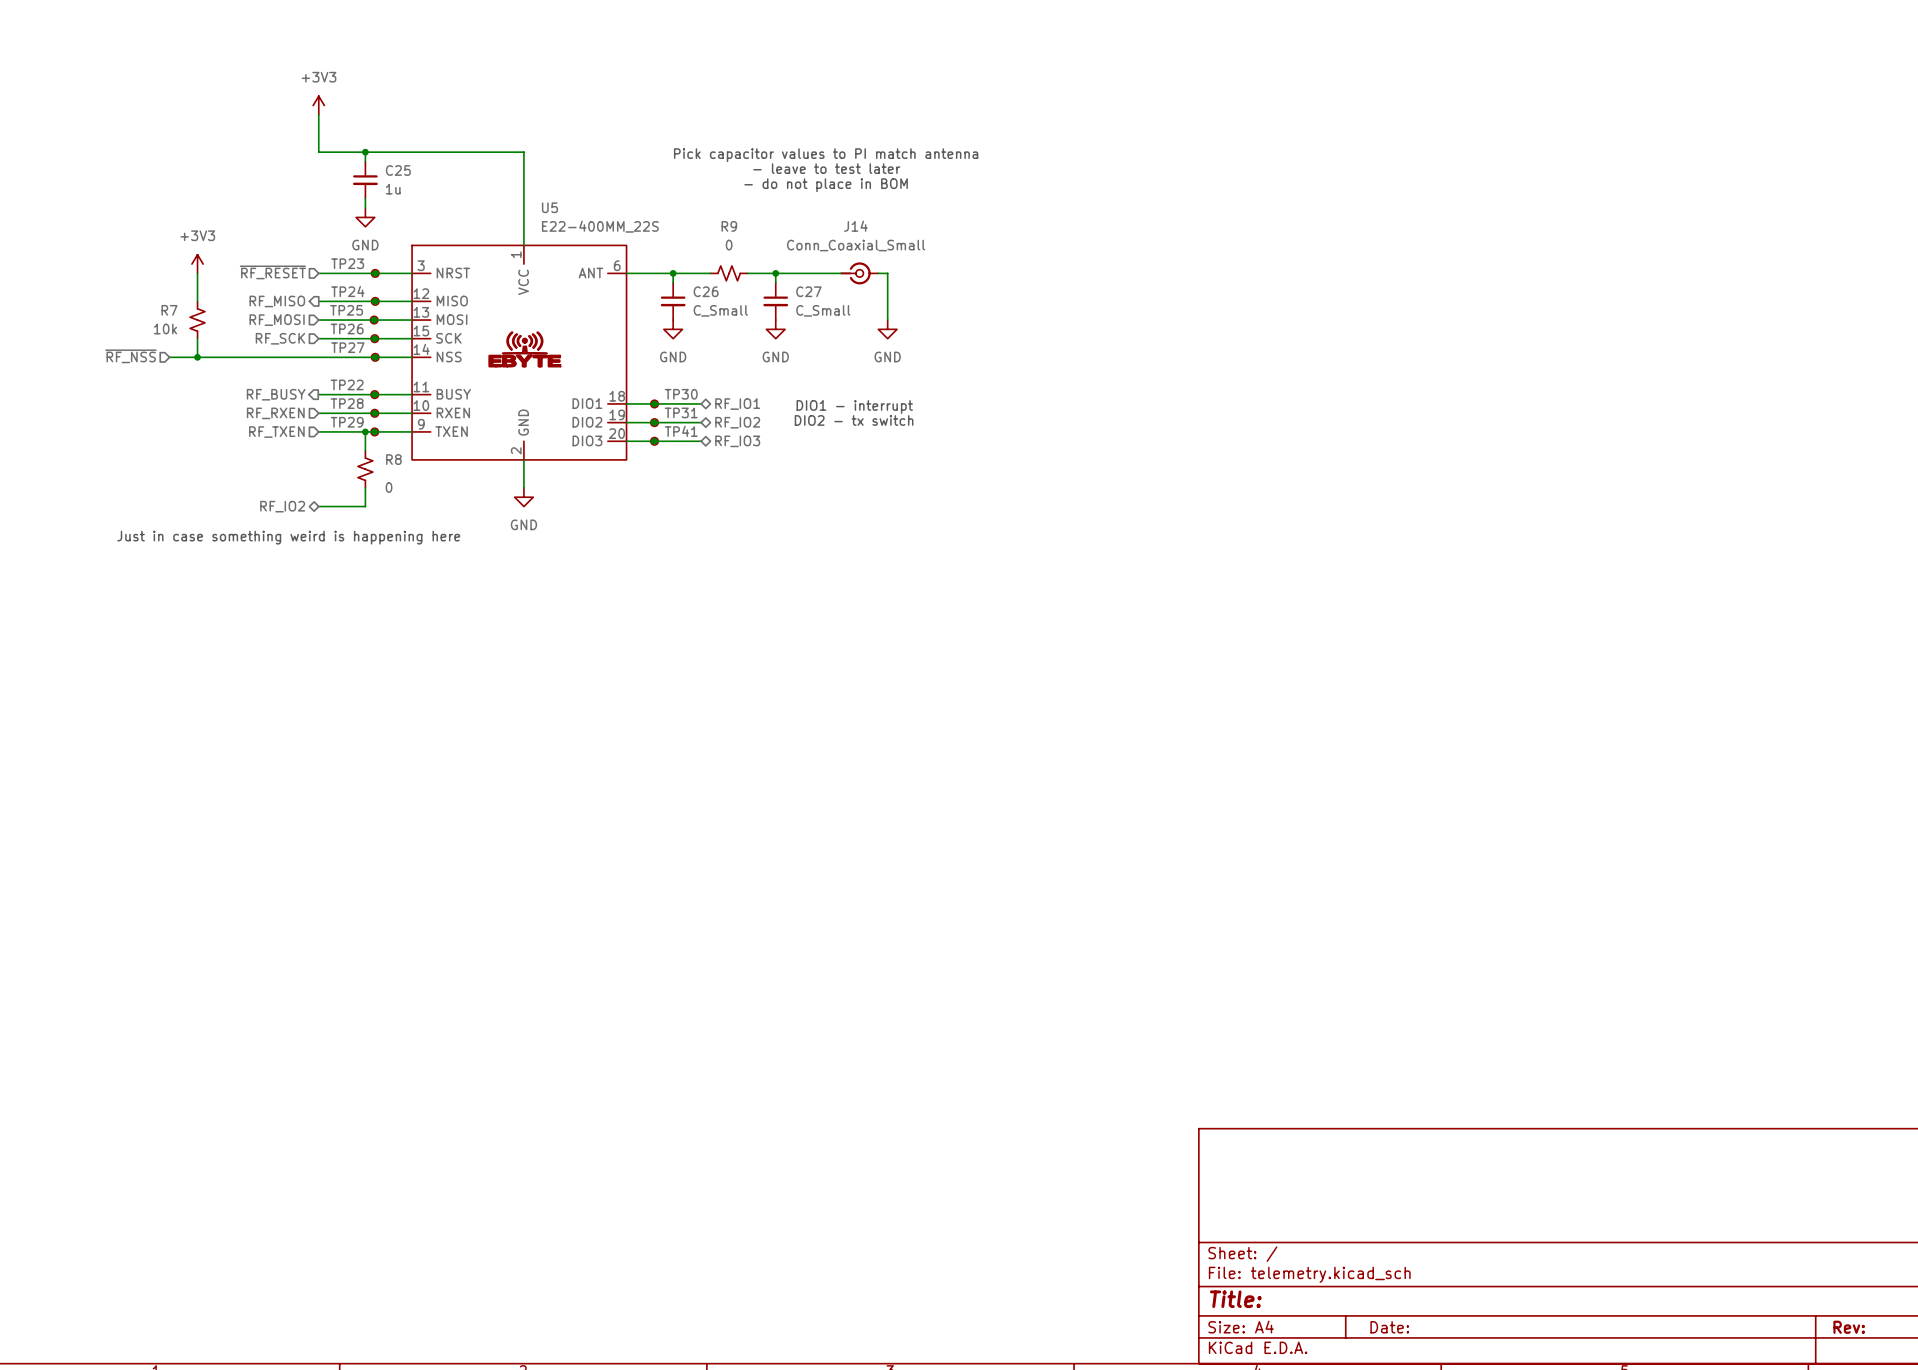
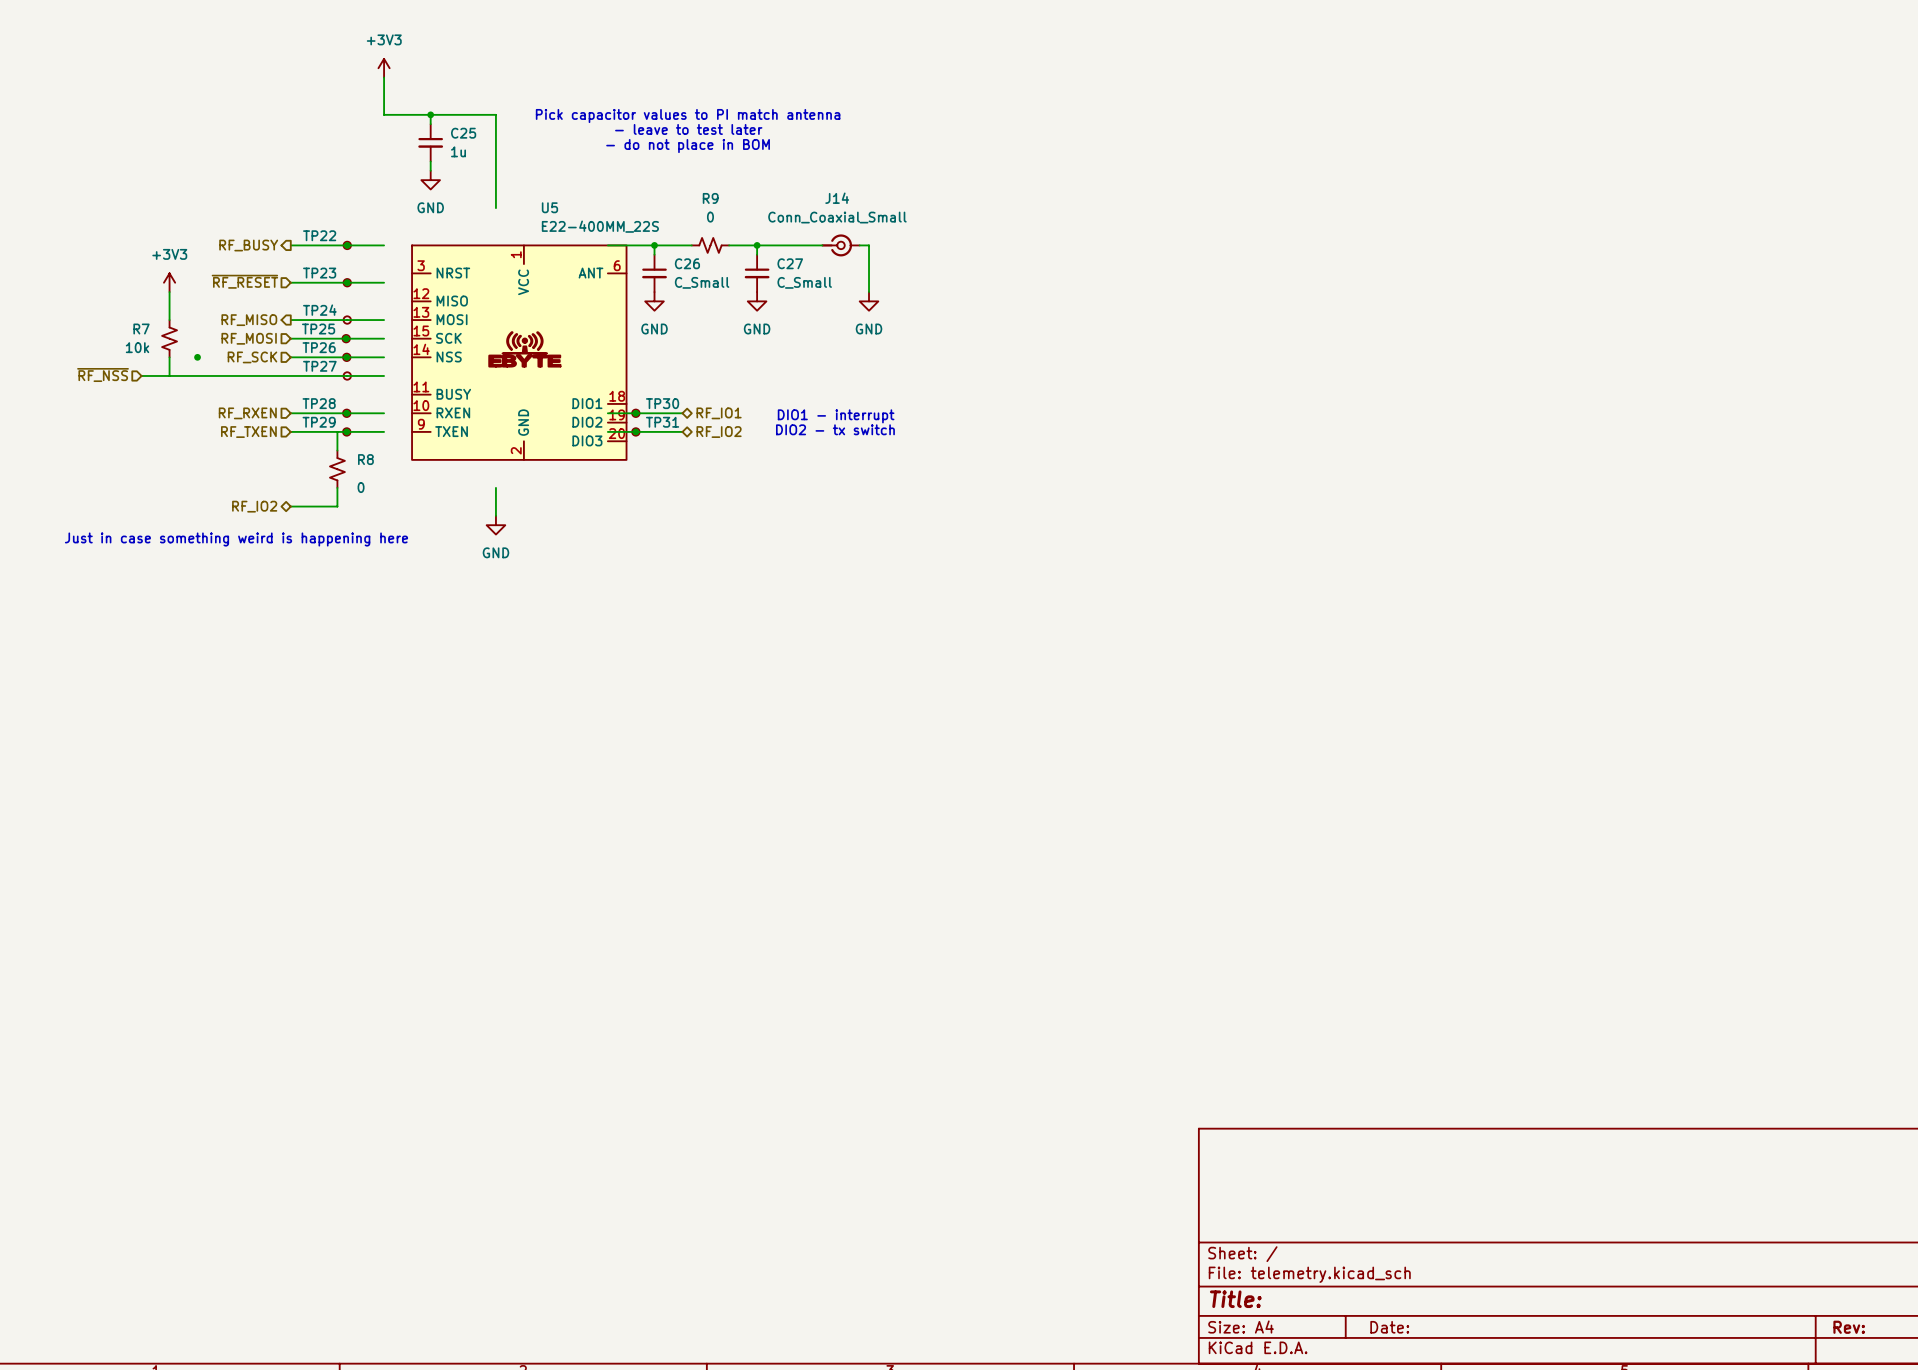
wire: none -> (384, 77) (384, 114) (495, 114) (495, 208)
power symbol position: +3V3 (318, 105) -> +3V3 (384, 68)
wire: (318, 114) (318, 152) (523, 152) (523, 245) -> none
junction: none -> (430, 114)
wire: (365, 152) (365, 161) -> (430, 114) (430, 124)
junction: (365, 152) -> none
text position: Pick capacitor values to PI match antenna (826, 155) -> Pick capacitor values to PI match antenna (688, 116)
text position: - leave to test later (826, 168) -> - leave to test later (688, 129)
C25 position: (365, 180) -> (430, 142)
text position: - do not place in BOM (826, 185) -> - do not place in BOM (688, 146)
wire: (365, 198) (365, 208) -> (430, 161) (430, 170)
power symbol position: GND (365, 217) -> GND (430, 180)
junction: none -> (347, 245)
power symbol position: +3V3 (197, 264) -> +3V3 (169, 282)
hierarchical label position: ~{RF_RESET} (272, 272) -> ~{RF_RESET} (244, 281)
wire: (197, 273) (197, 301) -> (169, 292) (169, 320)
wire: (318, 273) (412, 273) -> (290, 282) (384, 282)
junction: (375, 273) -> none
TP23 position: (375, 273) -> (347, 282)
wire: (626, 273) (710, 273) -> (607, 245) (691, 245)
wire: (673, 273) (673, 282) -> (654, 245) (654, 254)
junction position: (673, 273) -> (654, 245)
R9 position: (729, 273) -> (710, 245)
wire: (747, 273) (841, 273) -> (729, 245) (822, 245)
wire: (775, 273) (775, 282) -> (757, 245) (757, 254)
junction position: (775, 273) -> (757, 245)
J14 position: (859, 273) -> (841, 245)
wire: (878, 273) (887, 273) (887, 320) -> (859, 245) (869, 245) (869, 292)
junction: none -> (347, 282)
hierarchical label position: RF_MISO (277, 301) -> RF_MISO (249, 320)
wire: (318, 301) (412, 301) -> (290, 245) (384, 245)
junction: (375, 301) -> none
TP24 position: (375, 301) -> (347, 320)
C26 position: (673, 301) -> (654, 273)
C27 position: (775, 301) -> (757, 273)
R7 position: (197, 320) -> (169, 338)
hierarchical label position: RF_MOSI (277, 320) -> RF_MOSI (249, 338)
junction: (374, 320) -> none
TP25 position: (374, 320) -> (346, 338)
wire: (384, 320) (412, 320) -> (290, 320) (318, 320)
power symbol position: GND (673, 329) -> GND (654, 301)
power symbol position: GND (775, 329) -> GND (757, 301)
power symbol position: GND (887, 329) -> GND (869, 301)
wire: (197, 338) (197, 357) -> none
hierarchical label position: RF_SCK (280, 338) -> RF_SCK (252, 357)
junction: none -> (346, 338)
junction: (374, 338) -> none
TP26 position: (374, 338) -> (346, 357)
wire: (384, 338) (412, 338) -> (290, 338) (318, 338)
hierarchical label position: ~{RF_NSS} (130, 356) -> ~{RF_NSS} (103, 375)
wire: (169, 357) (290, 357) -> (169, 357) (169, 375)
junction: none -> (346, 357)
junction: (375, 357) -> none
TP27 position: (375, 357) -> (347, 375)
wire: (384, 357) (412, 357) -> (290, 506) (318, 506)
wire: none -> (141, 375) (384, 375)
hierarchical label position: RF_BUSY (276, 394) -> RF_BUSY (248, 245)
wire: (318, 394) (411, 394) -> none
junction: (374, 394) -> none
TP22 position: (374, 394) -> (347, 245)
wire: (626, 403) (701, 403) -> none
junction: (654, 403) -> none
TP30 position: (654, 403) -> (635, 413)
hierarchical label position: RF_IO1 (737, 404) -> RF_IO1 (719, 413)
text position: DIO1 - interrupt (854, 407) -> DIO1 - interrupt (836, 416)
hierarchical label position: RF_RXEN (275, 413) -> RF_RXEN (247, 413)
junction: none -> (346, 413)
junction: (374, 413) -> none
TP28 position: (374, 413) -> (346, 413)
wire: (384, 413) (412, 413) -> (290, 413) (318, 413)
junction: none -> (635, 413)
text position: DIO2 - tx switch (854, 420) -> DIO2 - tx switch (835, 429)
wire: (626, 422) (701, 422) -> (607, 431) (682, 431)
junction: (654, 422) -> none
TP31 position: (654, 422) -> (635, 431)
hierarchical label position: RF_IO2 (737, 422) -> RF_IO2 (719, 432)
junction: none -> (346, 431)
wire: (365, 431) (365, 450) -> (337, 431) (337, 450)
junction: (365, 431) -> none
junction: (374, 431) -> none
TP29 position: (374, 431) -> (346, 431)
wire: (384, 431) (412, 431) -> (290, 431) (318, 431)
junction: none -> (635, 431)
hierarchical label position: RF_TXEN (276, 432) -> RF_TXEN (248, 432)
wire: (626, 441) (701, 441) -> (607, 413) (682, 413)
junction: (654, 441) -> none
TP41: (654, 441) -> none
hierarchical label: RF_IO3 (737, 441) -> none
wire: (523, 459) (523, 487) -> (495, 487) (495, 515)
R8 position: (365, 469) -> (337, 469)
wire: (365, 487) (365, 506) (337, 506) -> (337, 487) (337, 506)
power symbol position: GND (523, 497) -> GND (495, 525)
hierarchical label position: RF_IO2 (282, 506) -> RF_IO2 (254, 506)
text position: Just in case something weird is happening here (288, 537) -> Just in case something weird is happening here (236, 539)

